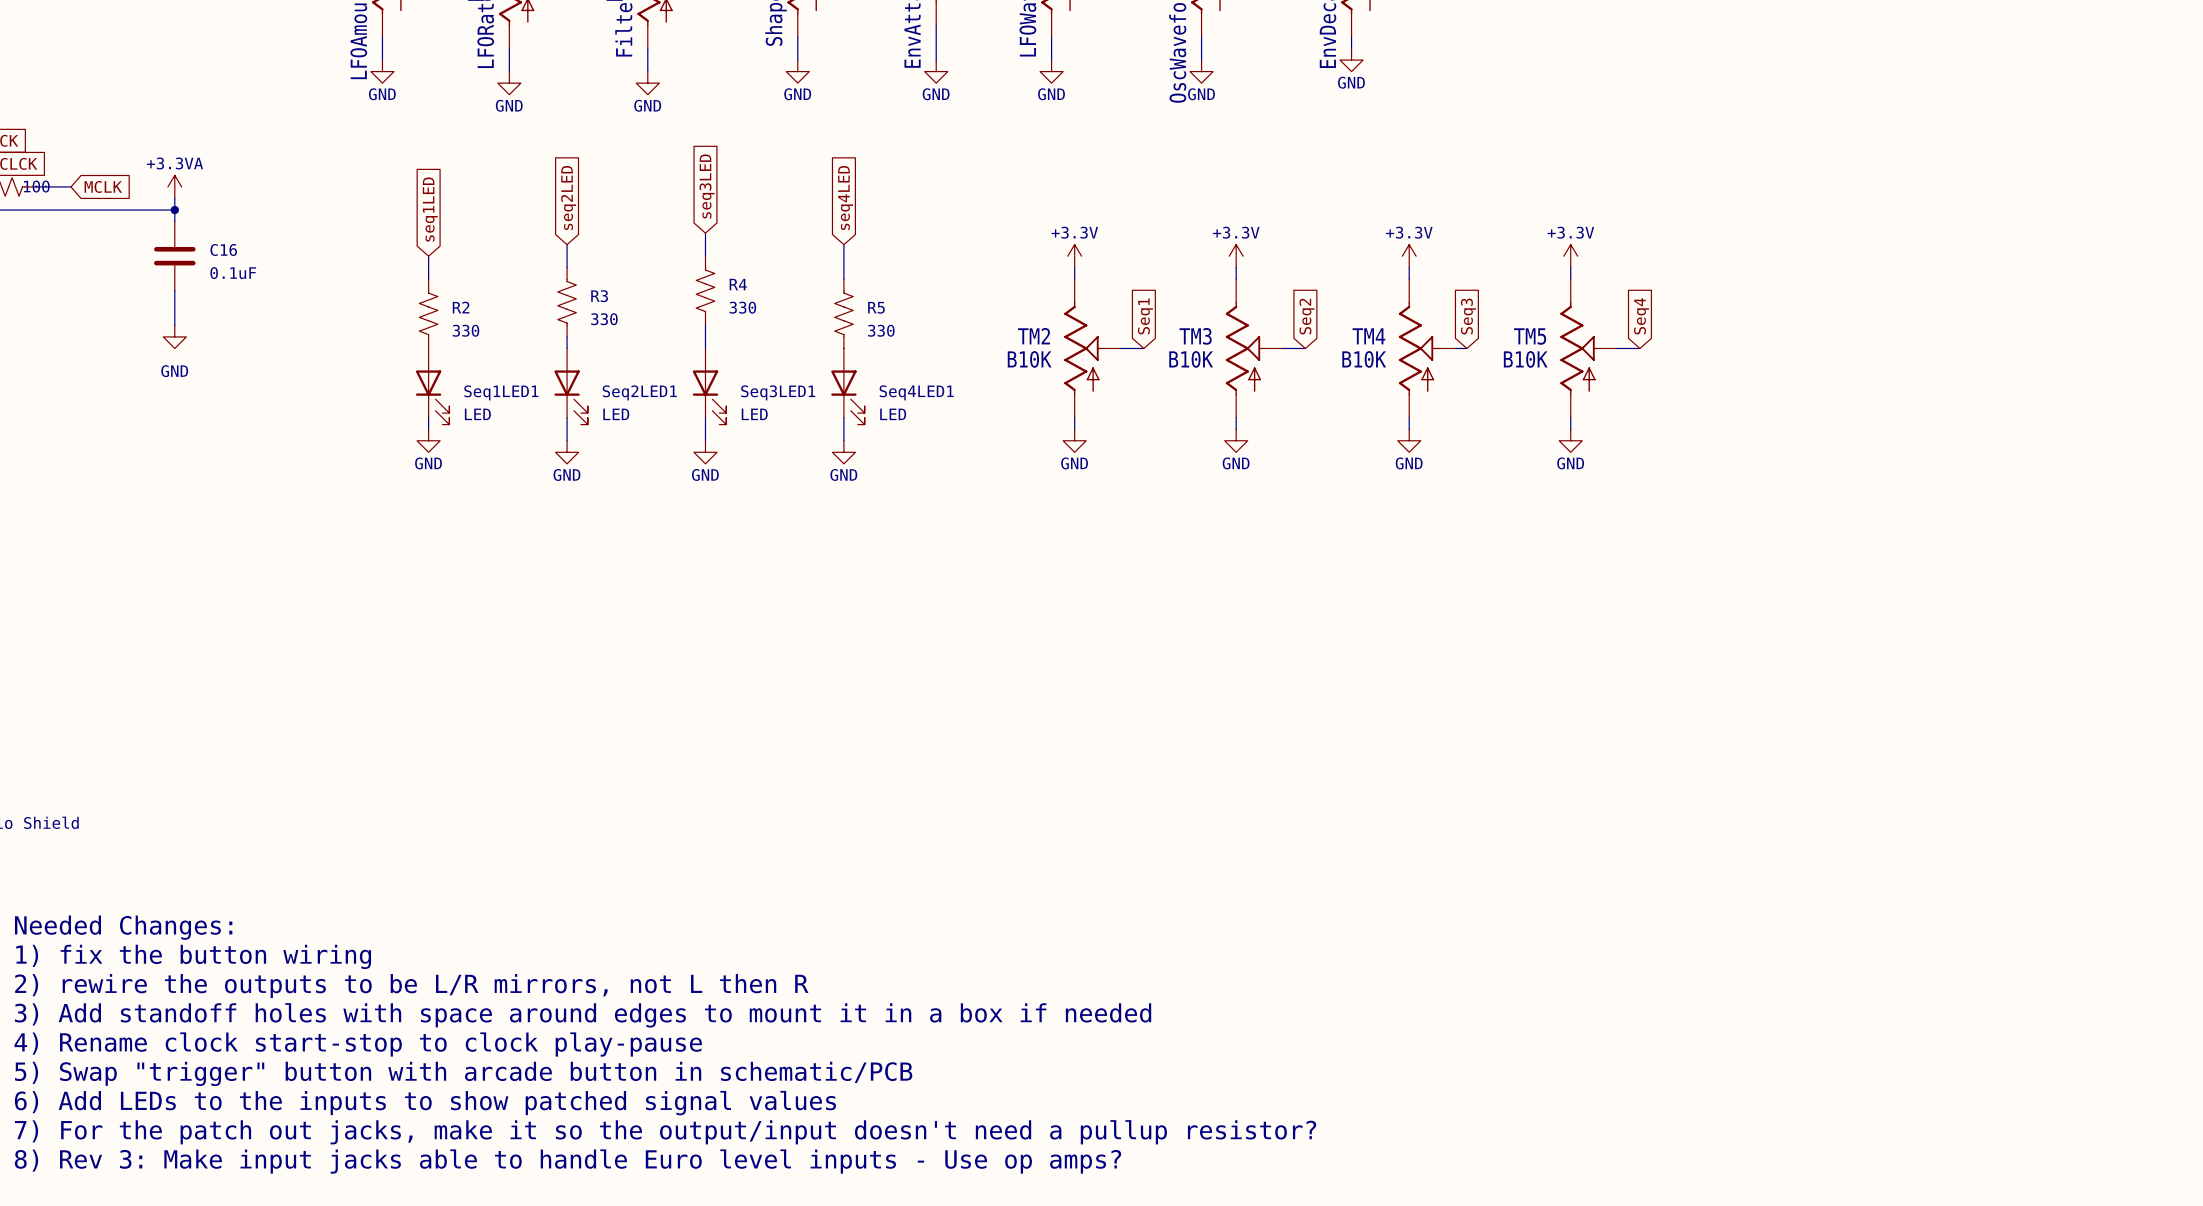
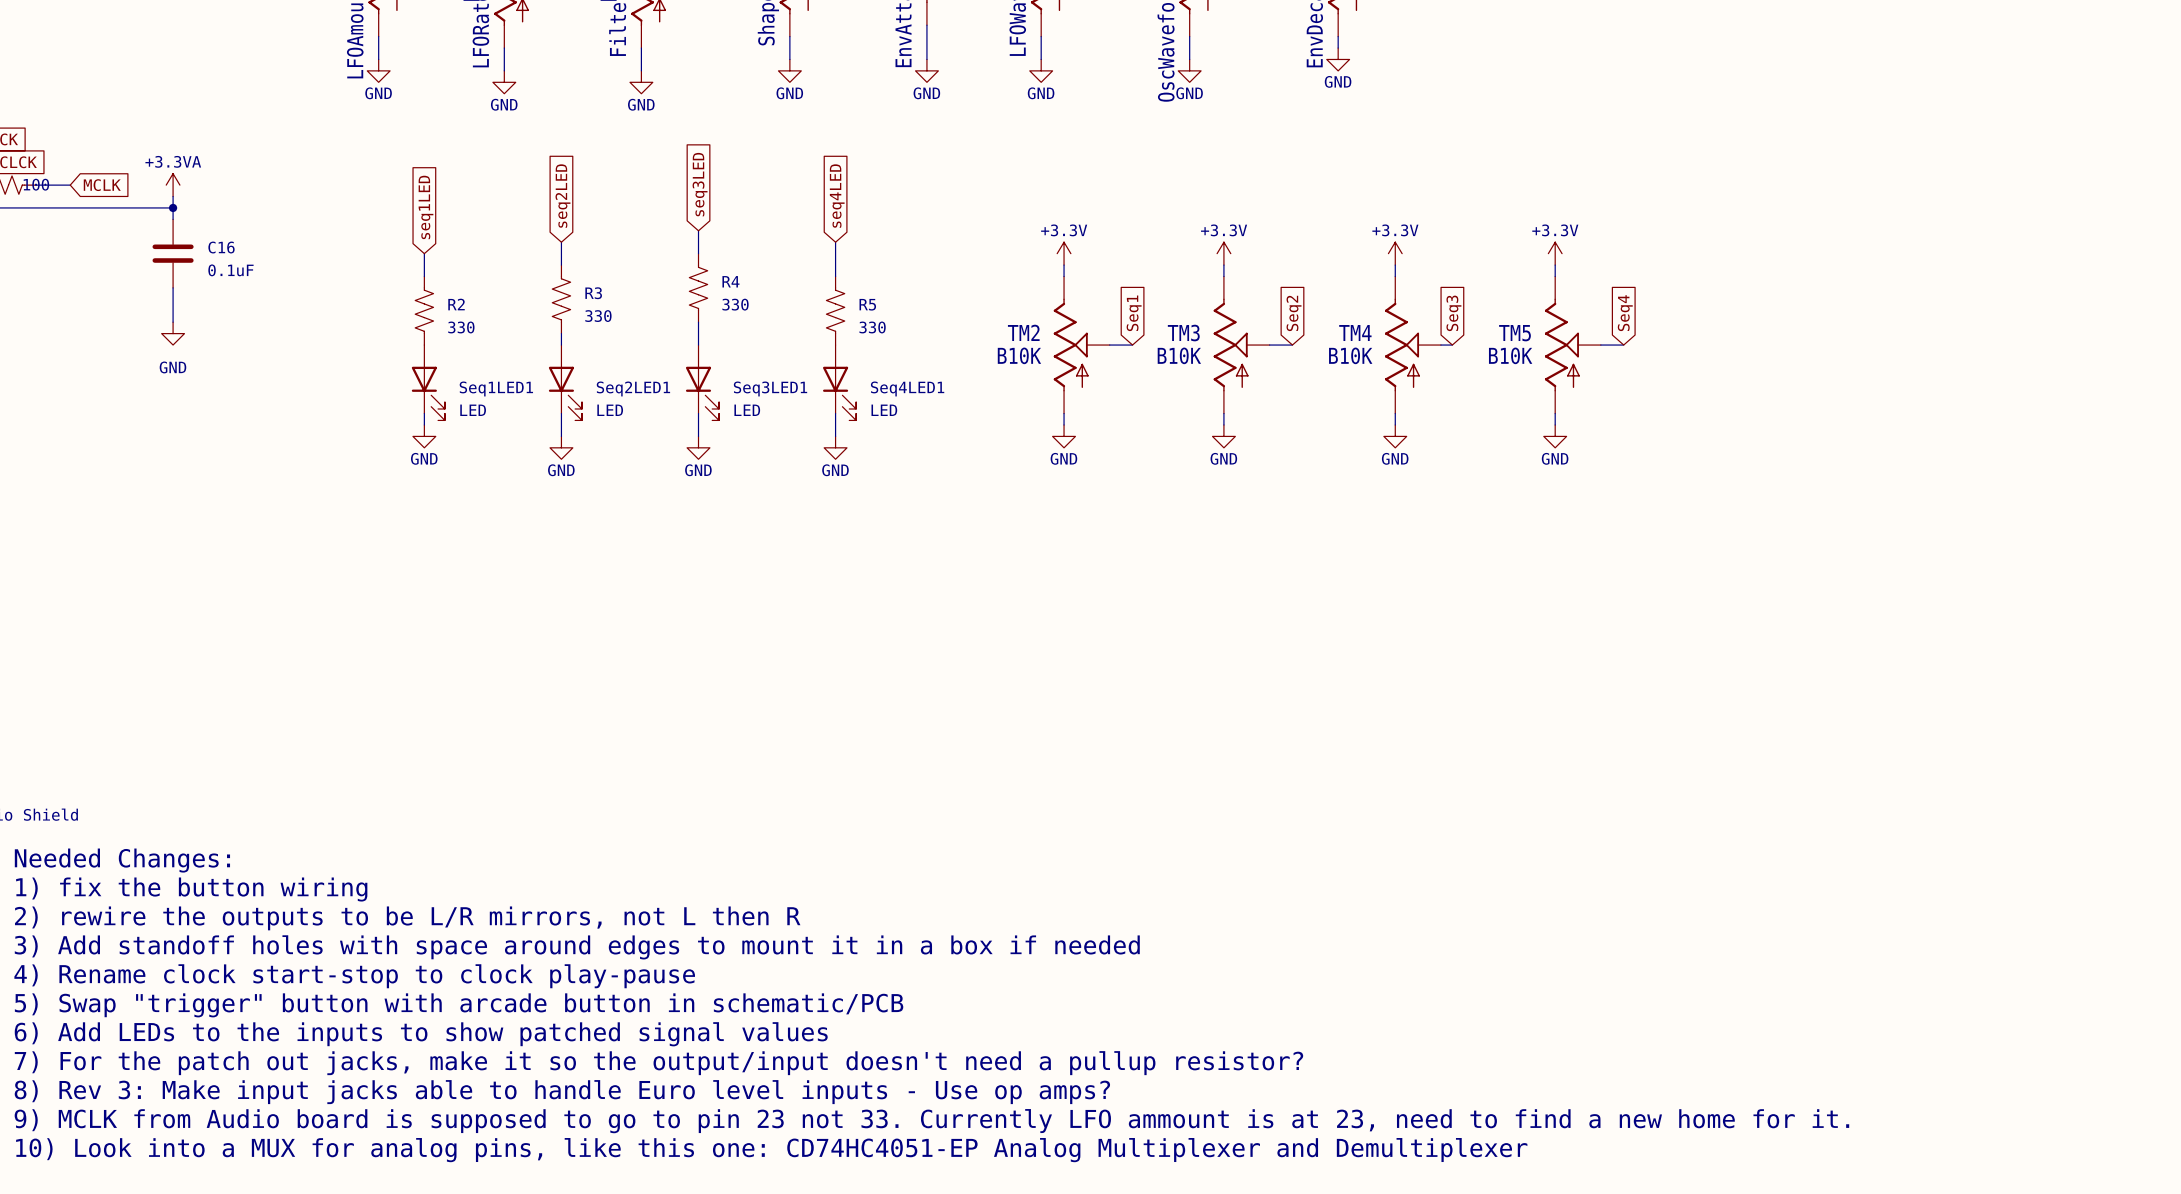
text: none -> Needed Changes: (122, 860)
text: none -> 1) fix the button wiring (191, 889)
text: Needed Changes: (123, 927) -> 2) rewire the outputs to be L/R mirrors, not L then R (407, 918)
text: 1) fix the button wiring (193, 956) -> 3) Add standoff holes with space around edges to mount it in a box if needed (577, 947)
text: 2) rewire the outputs to be L/R mirrors, not L then R (411, 986) -> 4) Rename clock start-stop to clock play-pause (354, 976)
text: 3) Add standoff holes with space around edges to mount it in a box if needed (583, 1015) -> 5) Swap "trigger" button with arcade button in schematic/PCB (459, 1005)
text: 4) Rename clock start-stop to clock play-pause (358, 1044) -> 6) Add LEDs to the inputs to show patched signal values (421, 1034)
text: 5) Swap "trigger" button with arcade button in schematic/PCB (463, 1073) -> 7) For the patch out jacks, make it so the output/input doesn't need a pullup resistor? (658, 1063)
text: 6) Add LEDs to the inputs to show patched signal values (425, 1103) -> 8) Rev 3: Make input jacks able to handle Euro level inputs - Use op amps? (562, 1092)
text: 7) For the patch out jacks, make it so the output/input doesn't need a pullup resistor? (665, 1132) -> 9) MCLK from Audio board is supposed to go to pin 23 not 33. Currently LFO ammount is at 23, need to find a new home for it. (931, 1121)
text: 8) Rev 3: Make input jacks able to handle Euro level inputs - Use op amps? (568, 1161) -> 10) Look into a MUX for analog pins, like this one: CD74HC4051-EP Analog Multiplexer and Demultiplexer (771, 1150)

